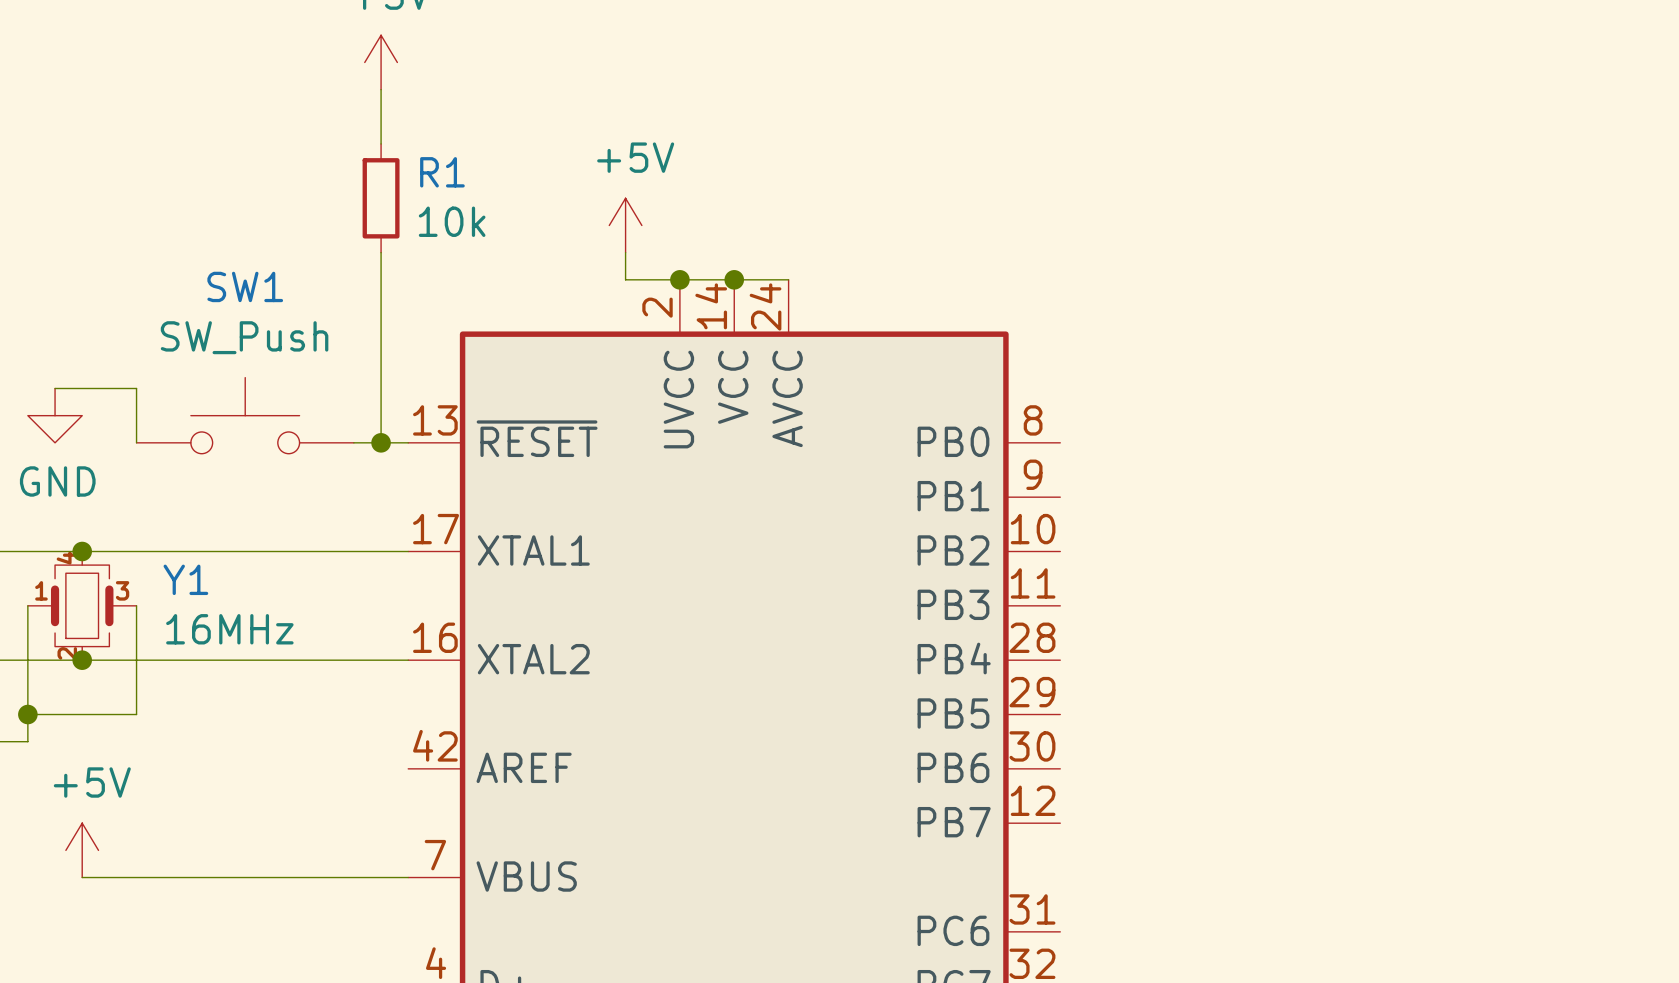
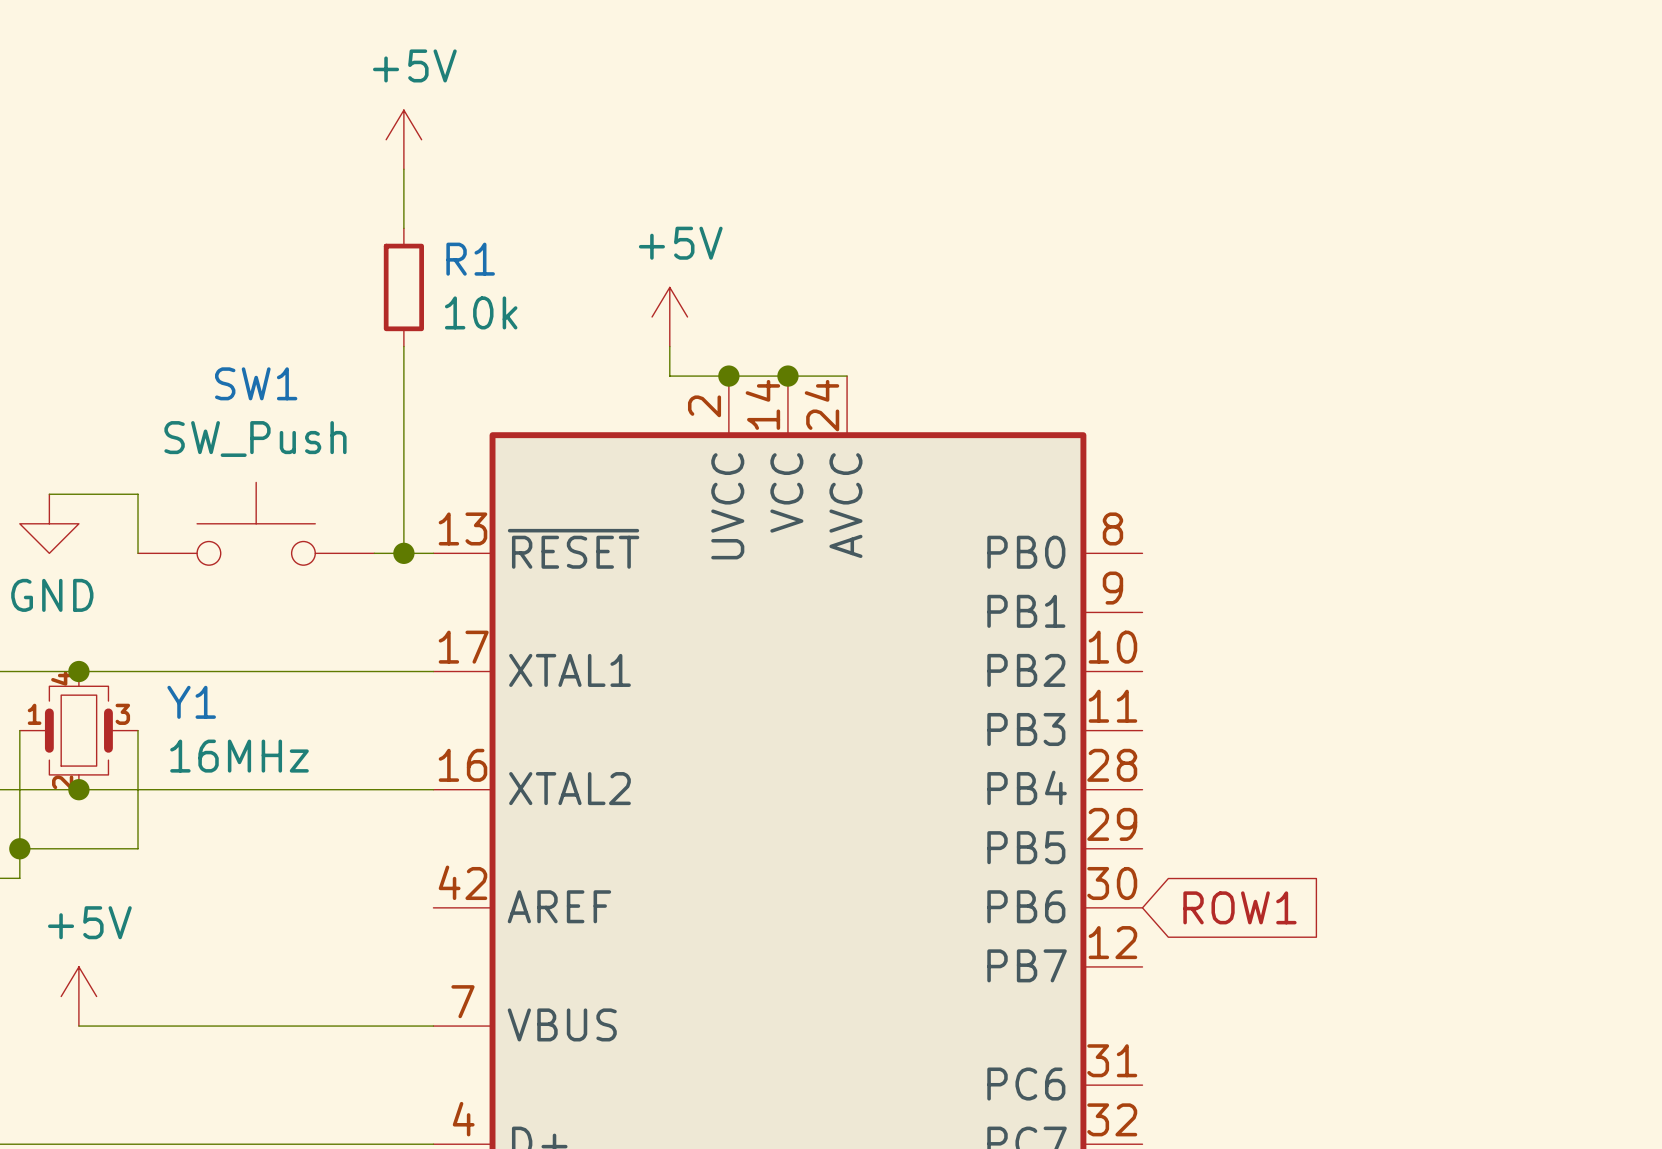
global label: none -> ROW1 (1239, 907)

